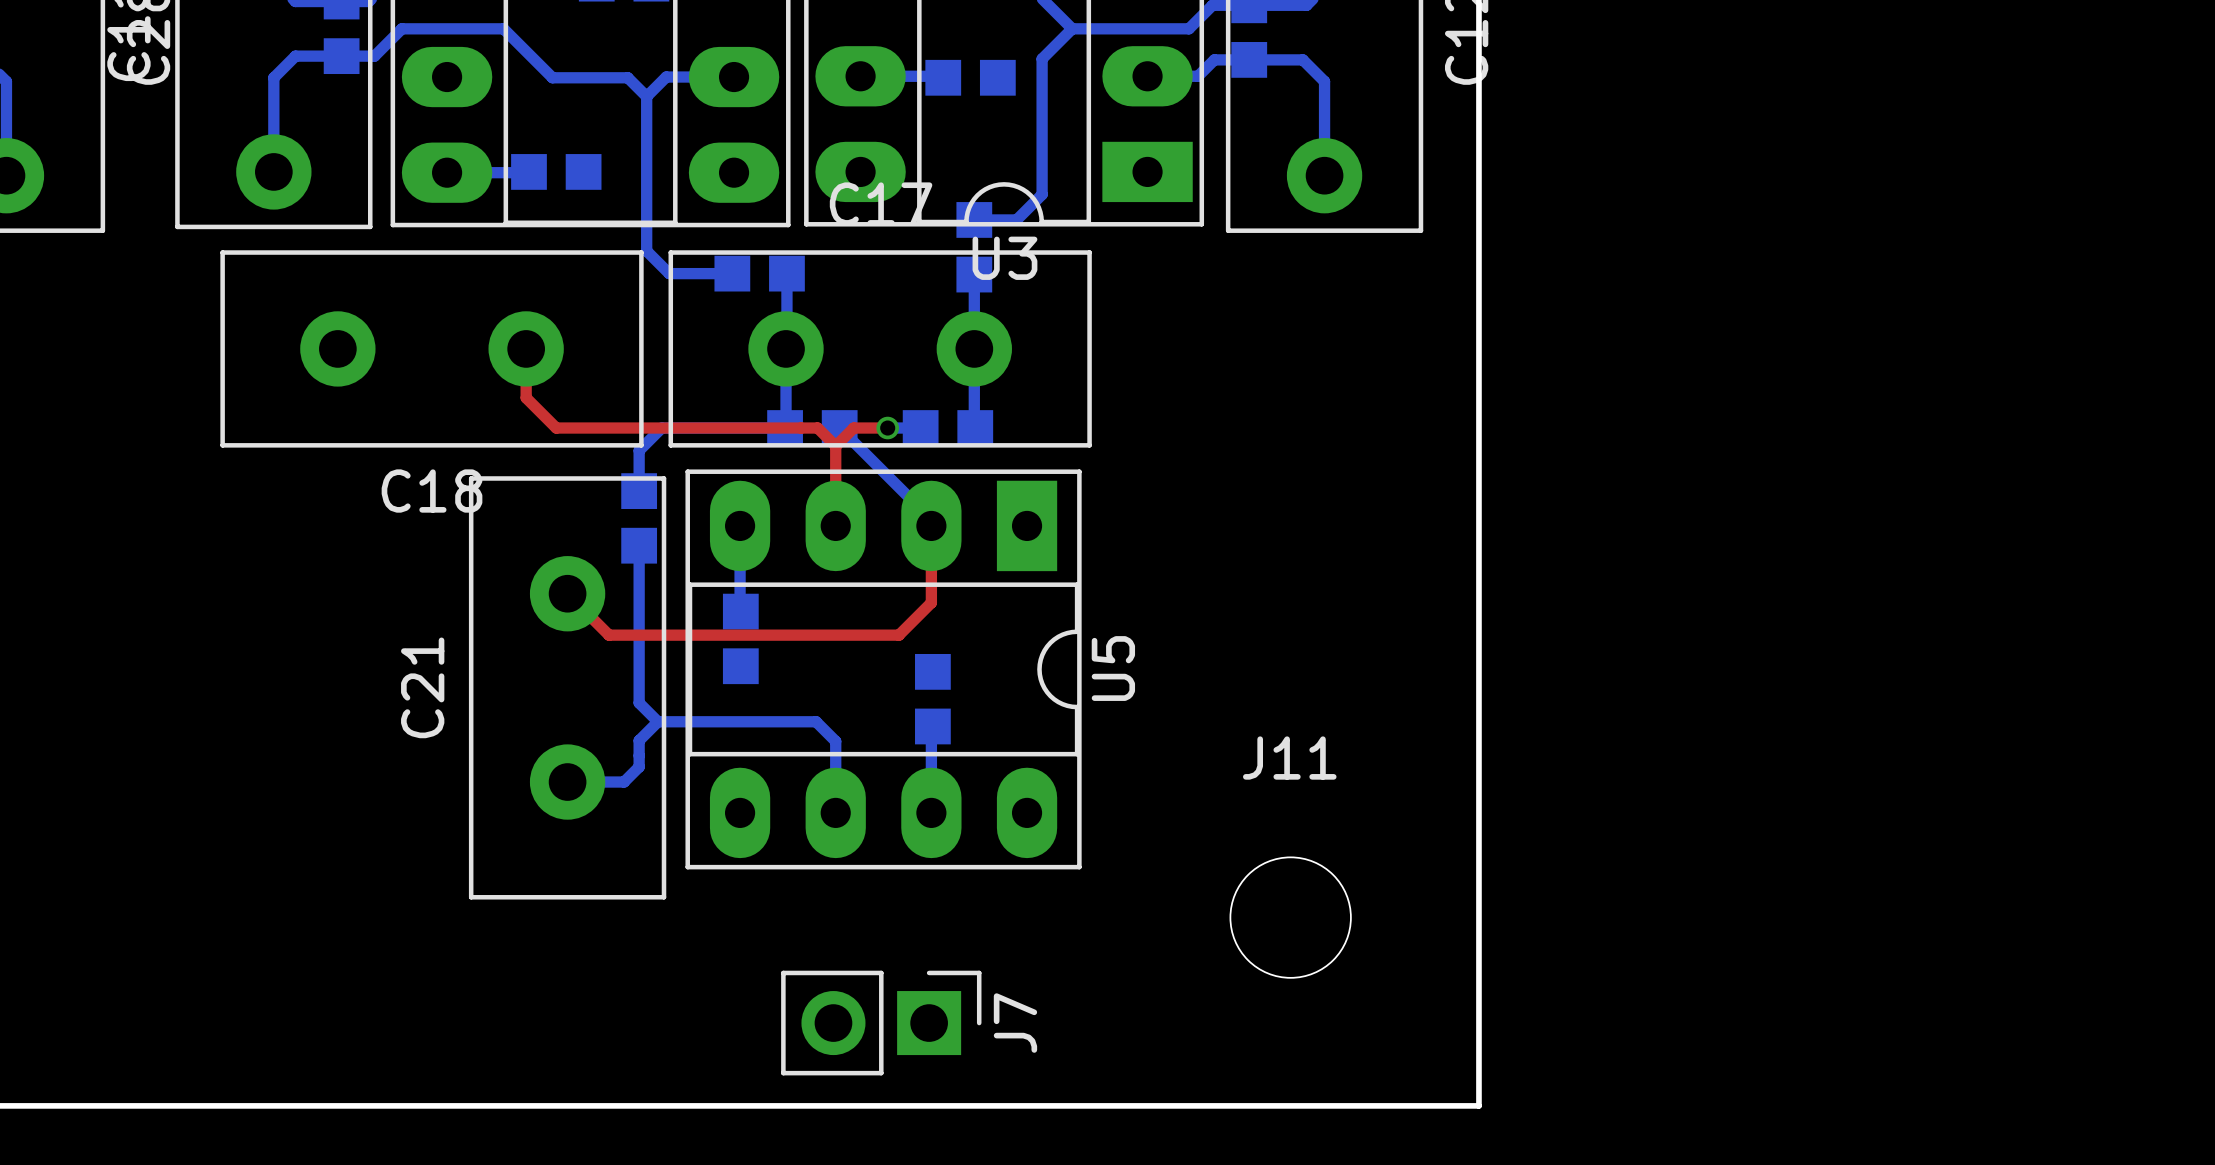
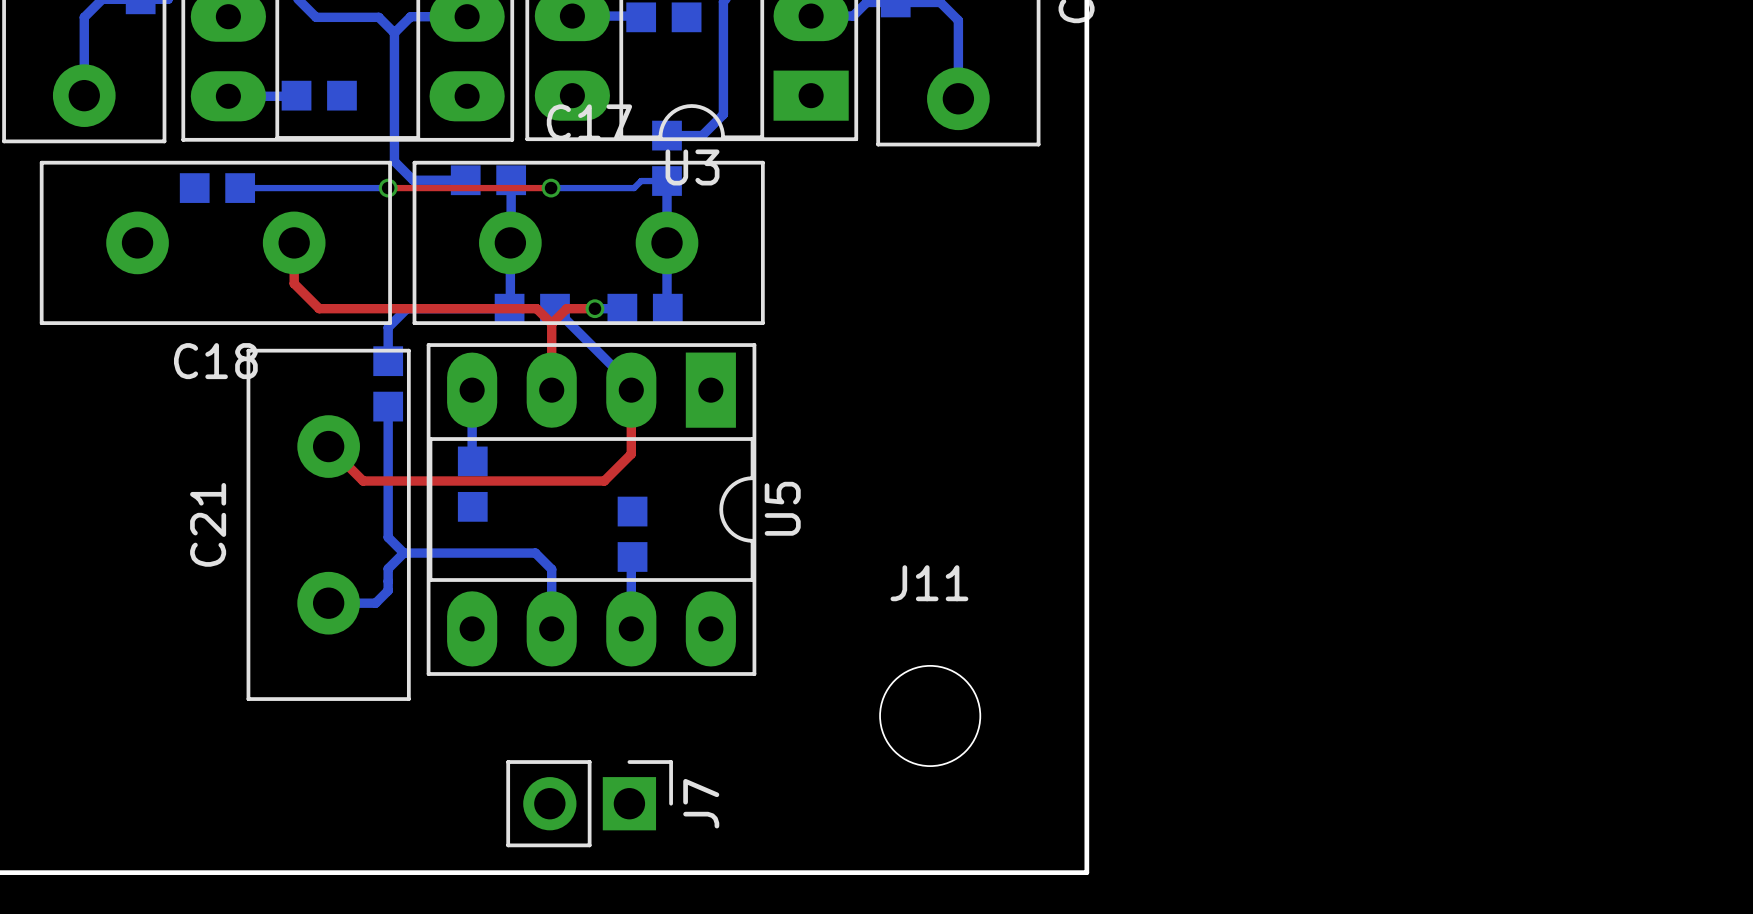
bottom track: none -> (667, 181) (641, 181) (634, 188) (551, 188)
part: none -> (217, 188)
bottom track: none -> (240, 188) (388, 188)
top track: none -> (388, 188) (551, 188)
via: none -> (388, 188)
via: none -> (551, 188)

